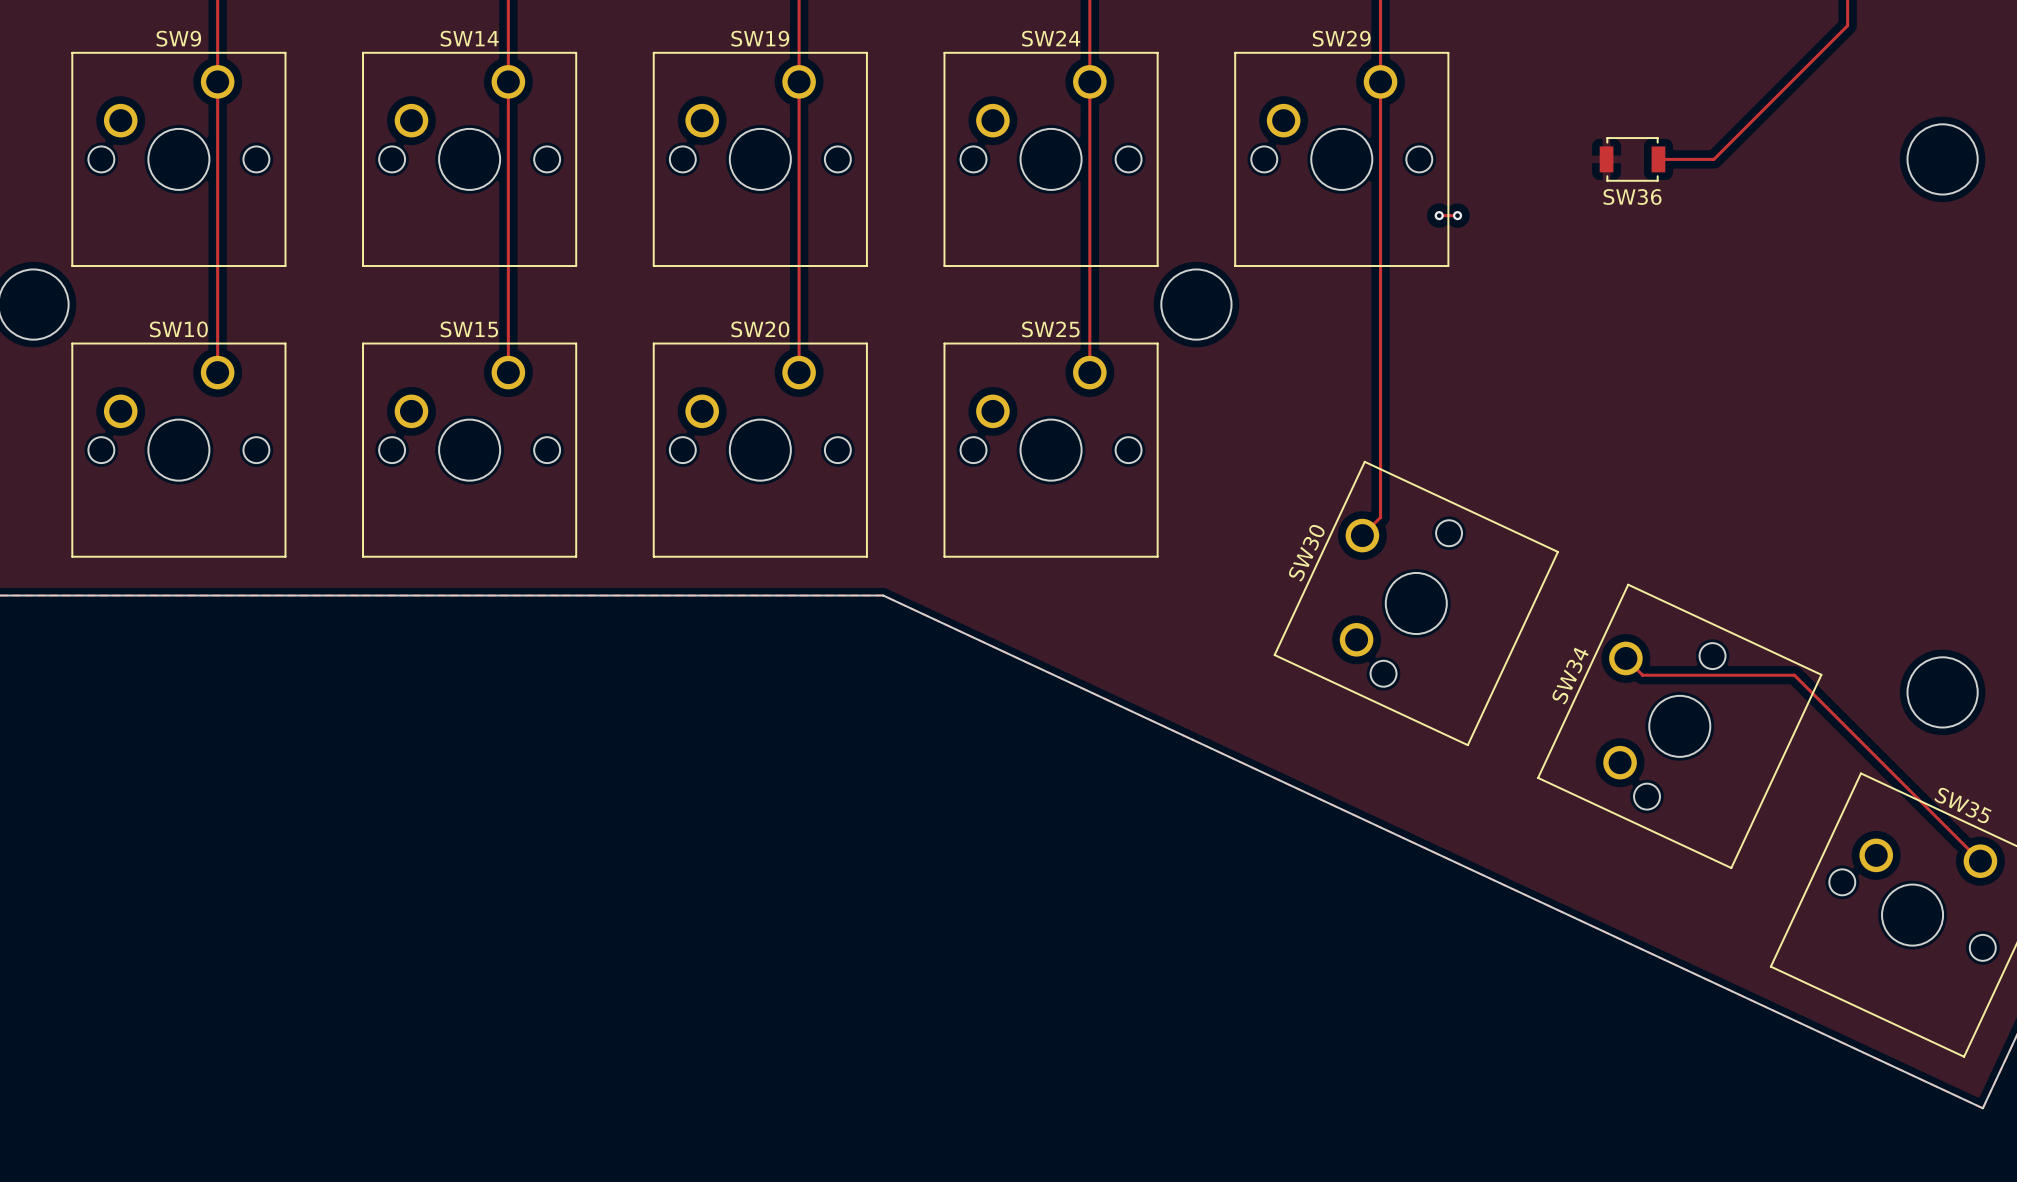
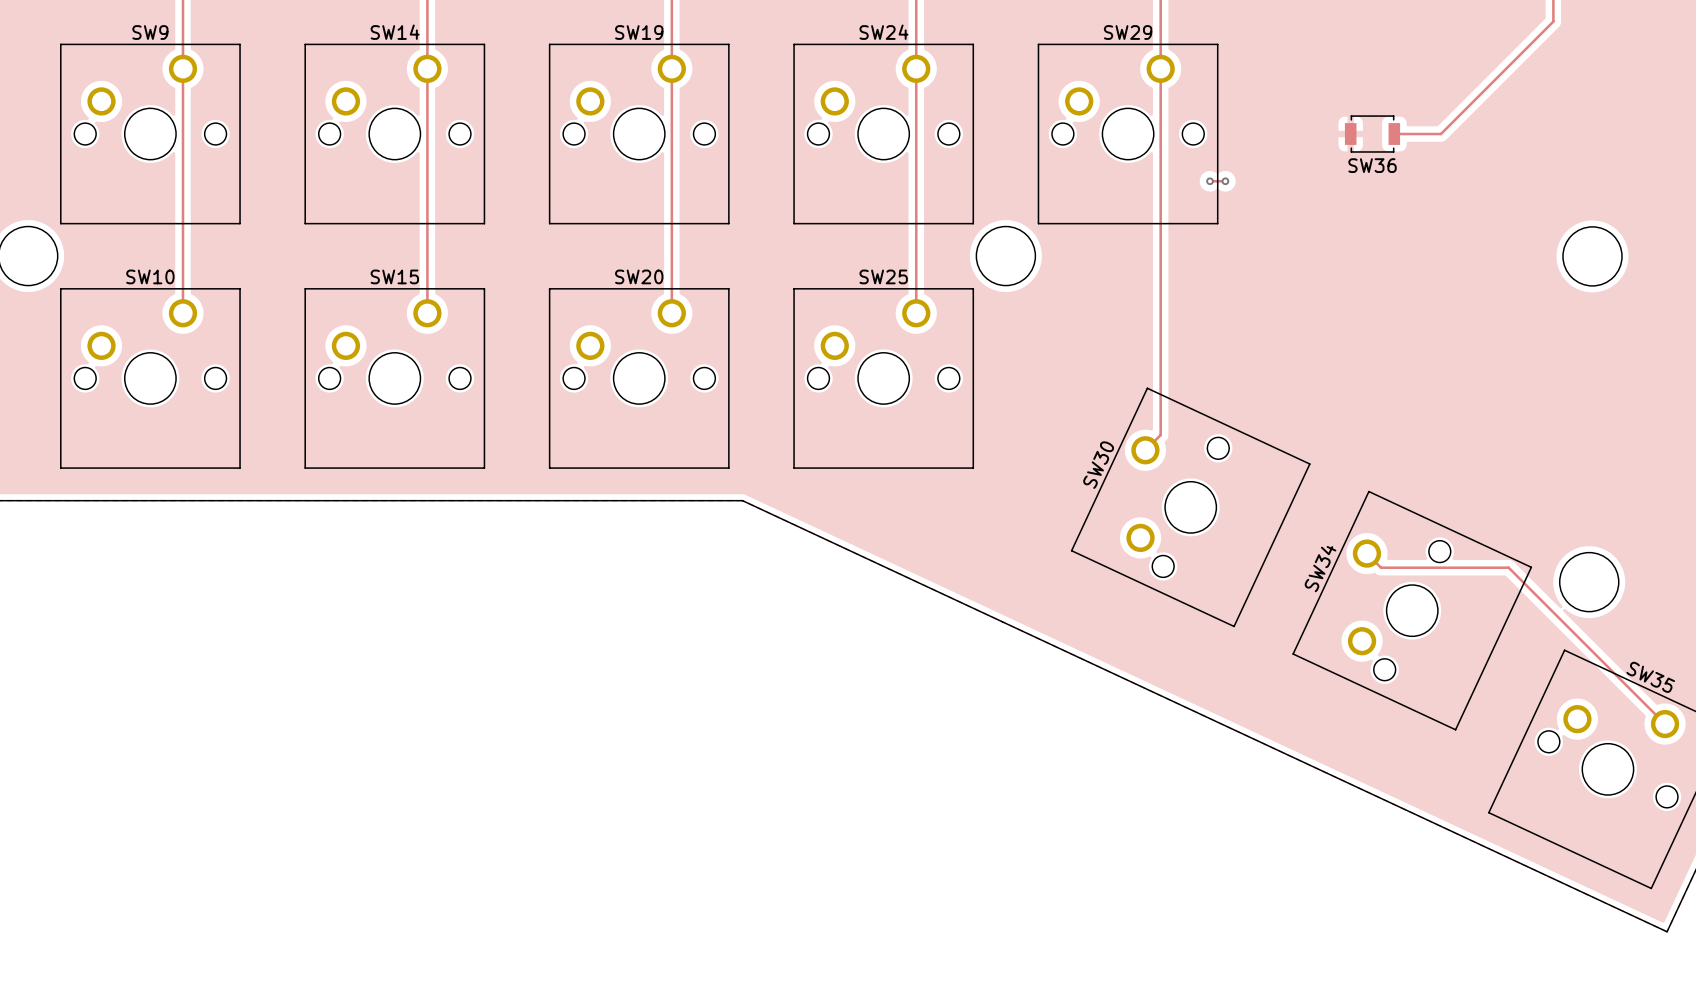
round board edge position: (1942, 159) -> (1592, 256)
round board edge position: (1942, 692) -> (1589, 582)

